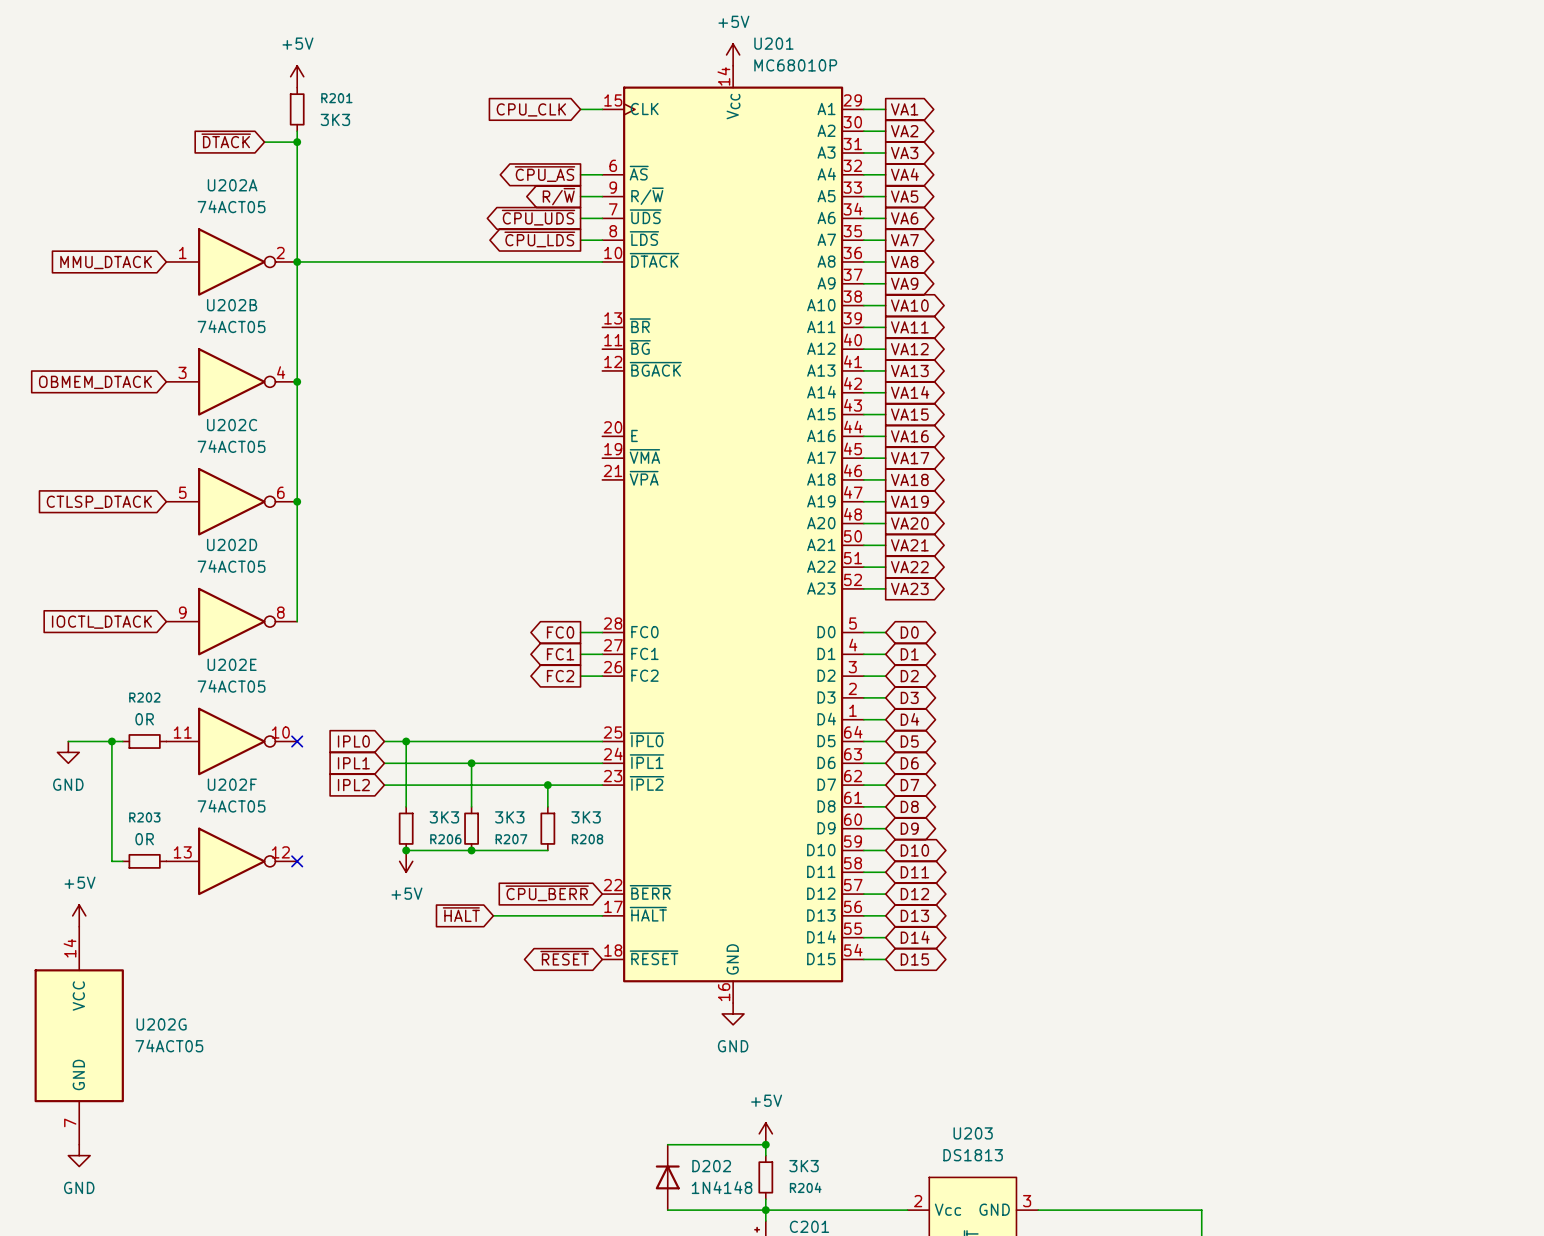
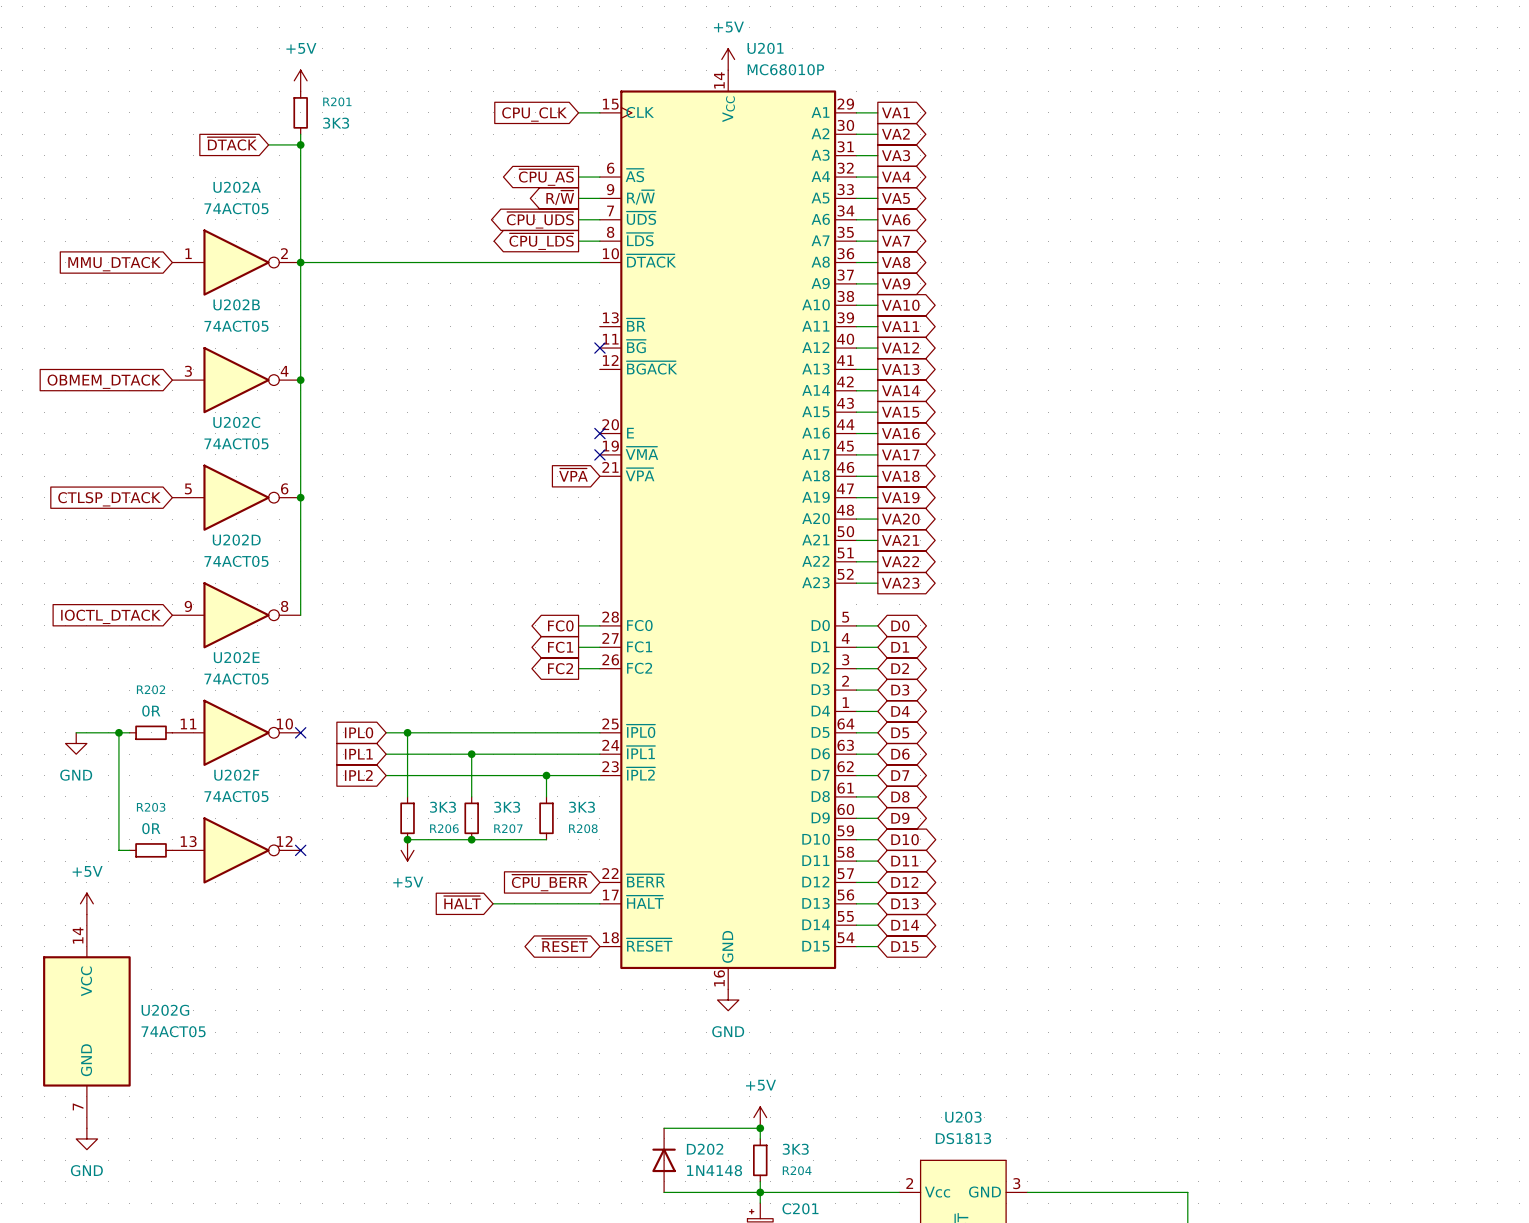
no-connect mark: none -> (599, 348)
no-connect mark: none -> (599, 433)
no-connect mark: none -> (599, 454)
global label: none -> ~{VPA} (573, 475)

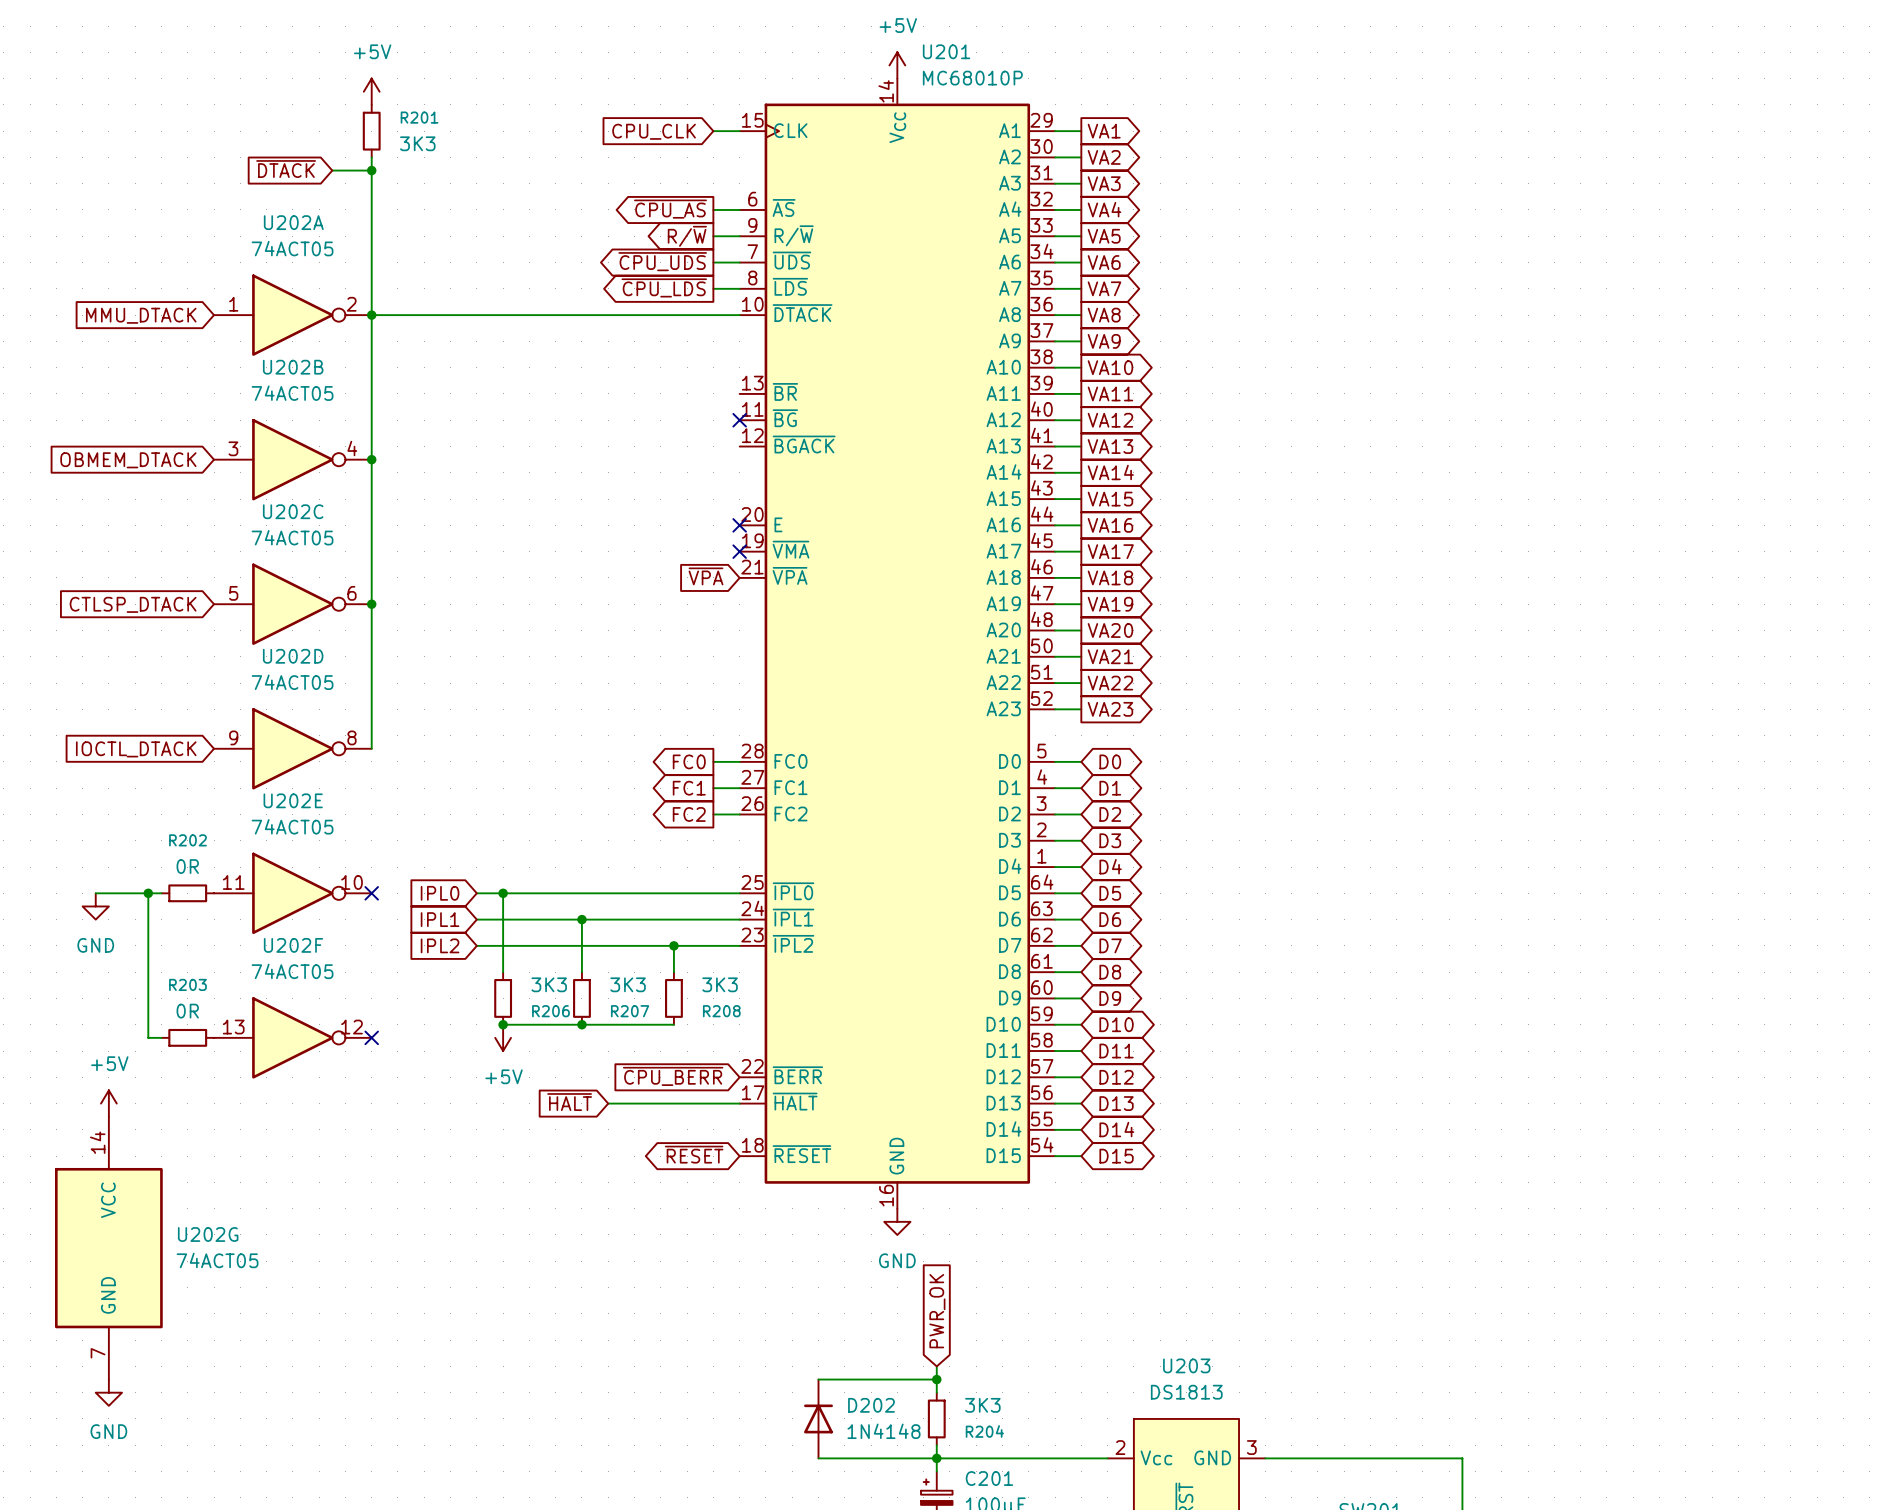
global label: none -> PWR_OK (937, 1311)
power symbol: +5V (760, 1117) -> none

